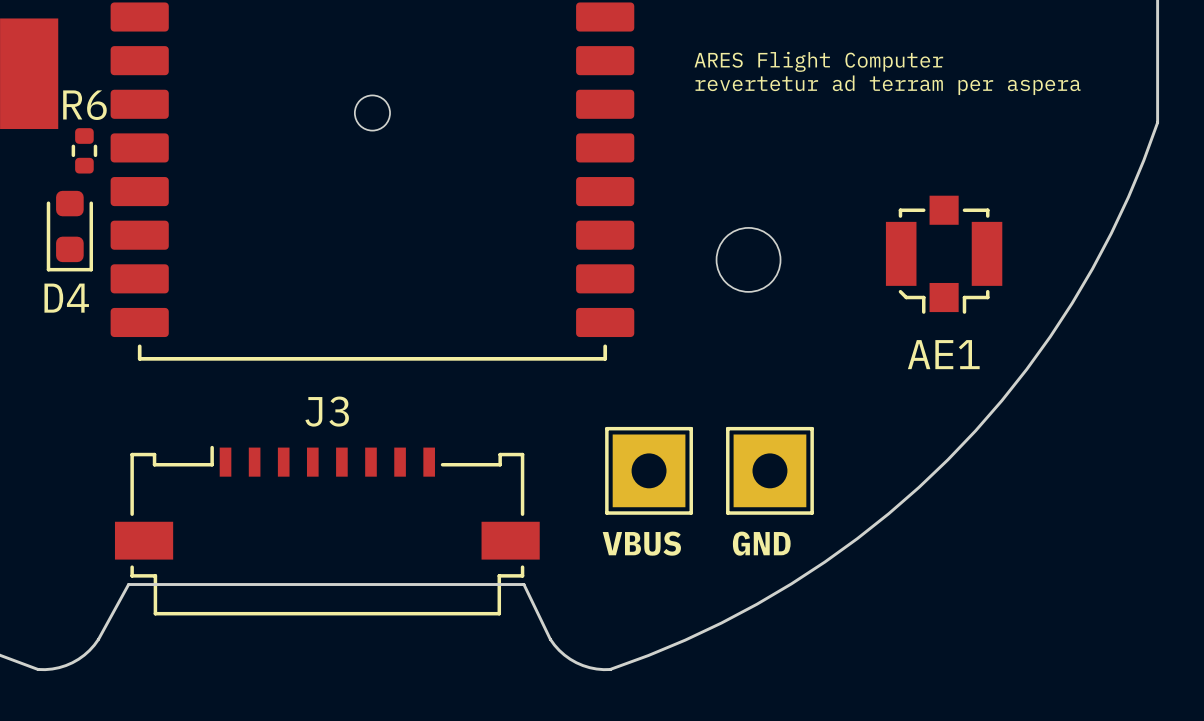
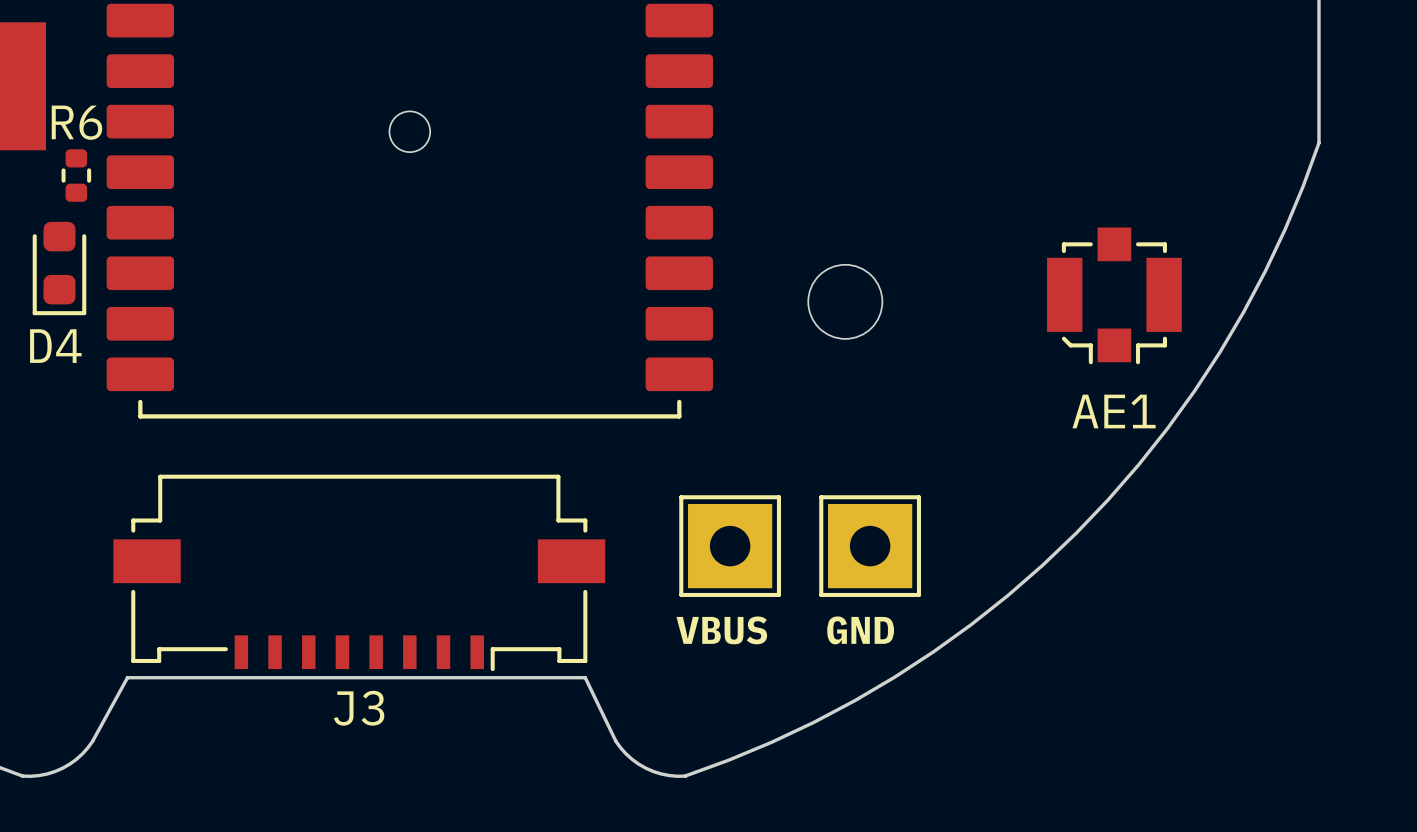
text: ARES Flight Computer (818, 61) -> none
text: revertetur ad terram per aspera (888, 85) -> none
AE1 position: (944, 254) -> (1114, 295)
J3 rotation: 0° (327, 530) -> 180° (359, 572)

